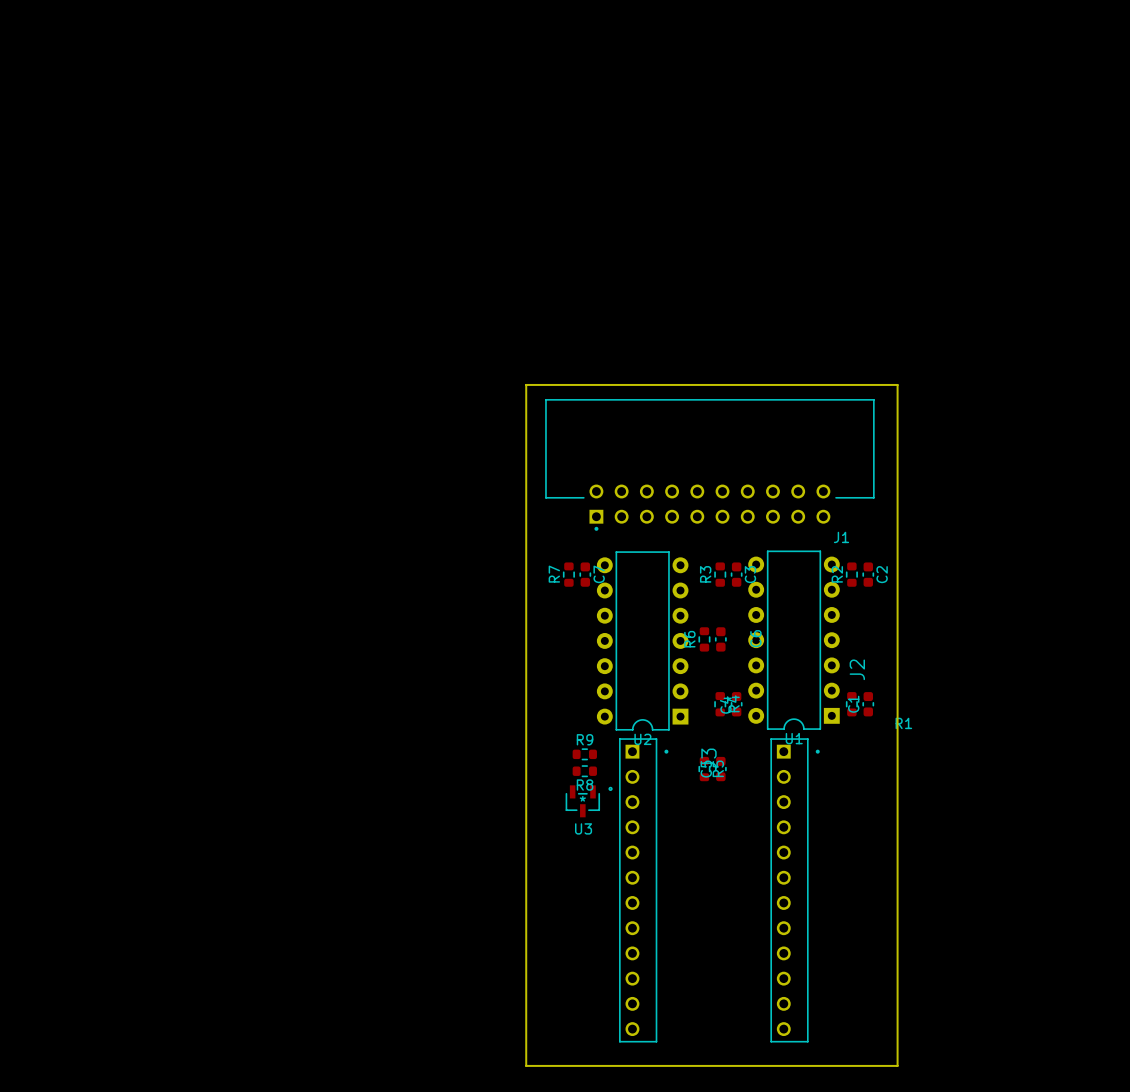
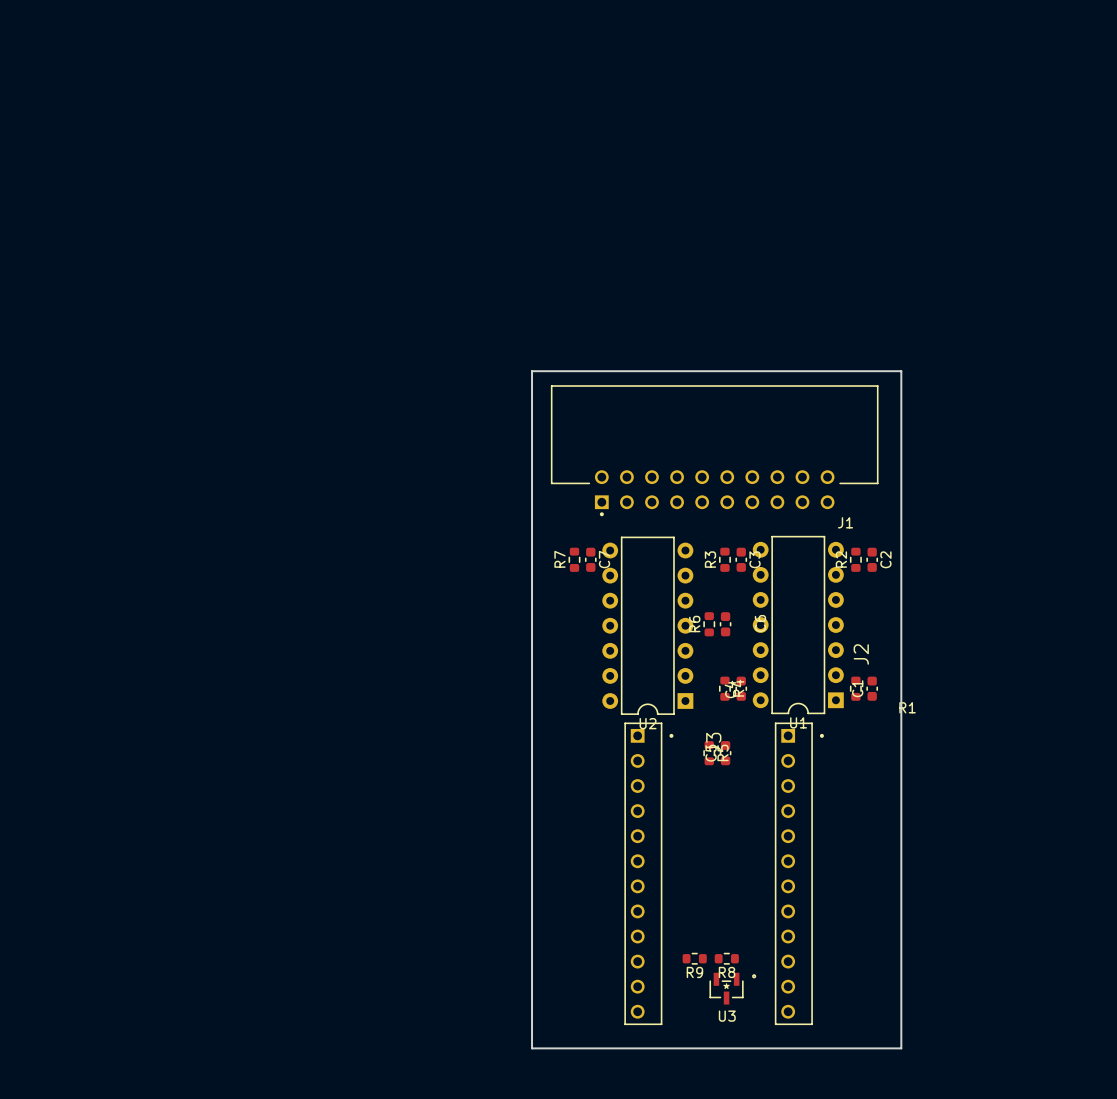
R9 name position: R9 (585, 739) -> R9 (694, 972)
R9 position: (584, 754) -> (694, 958)
R8 position: (584, 771) -> (726, 958)
U3 position: (589, 801) -> (732, 988)

